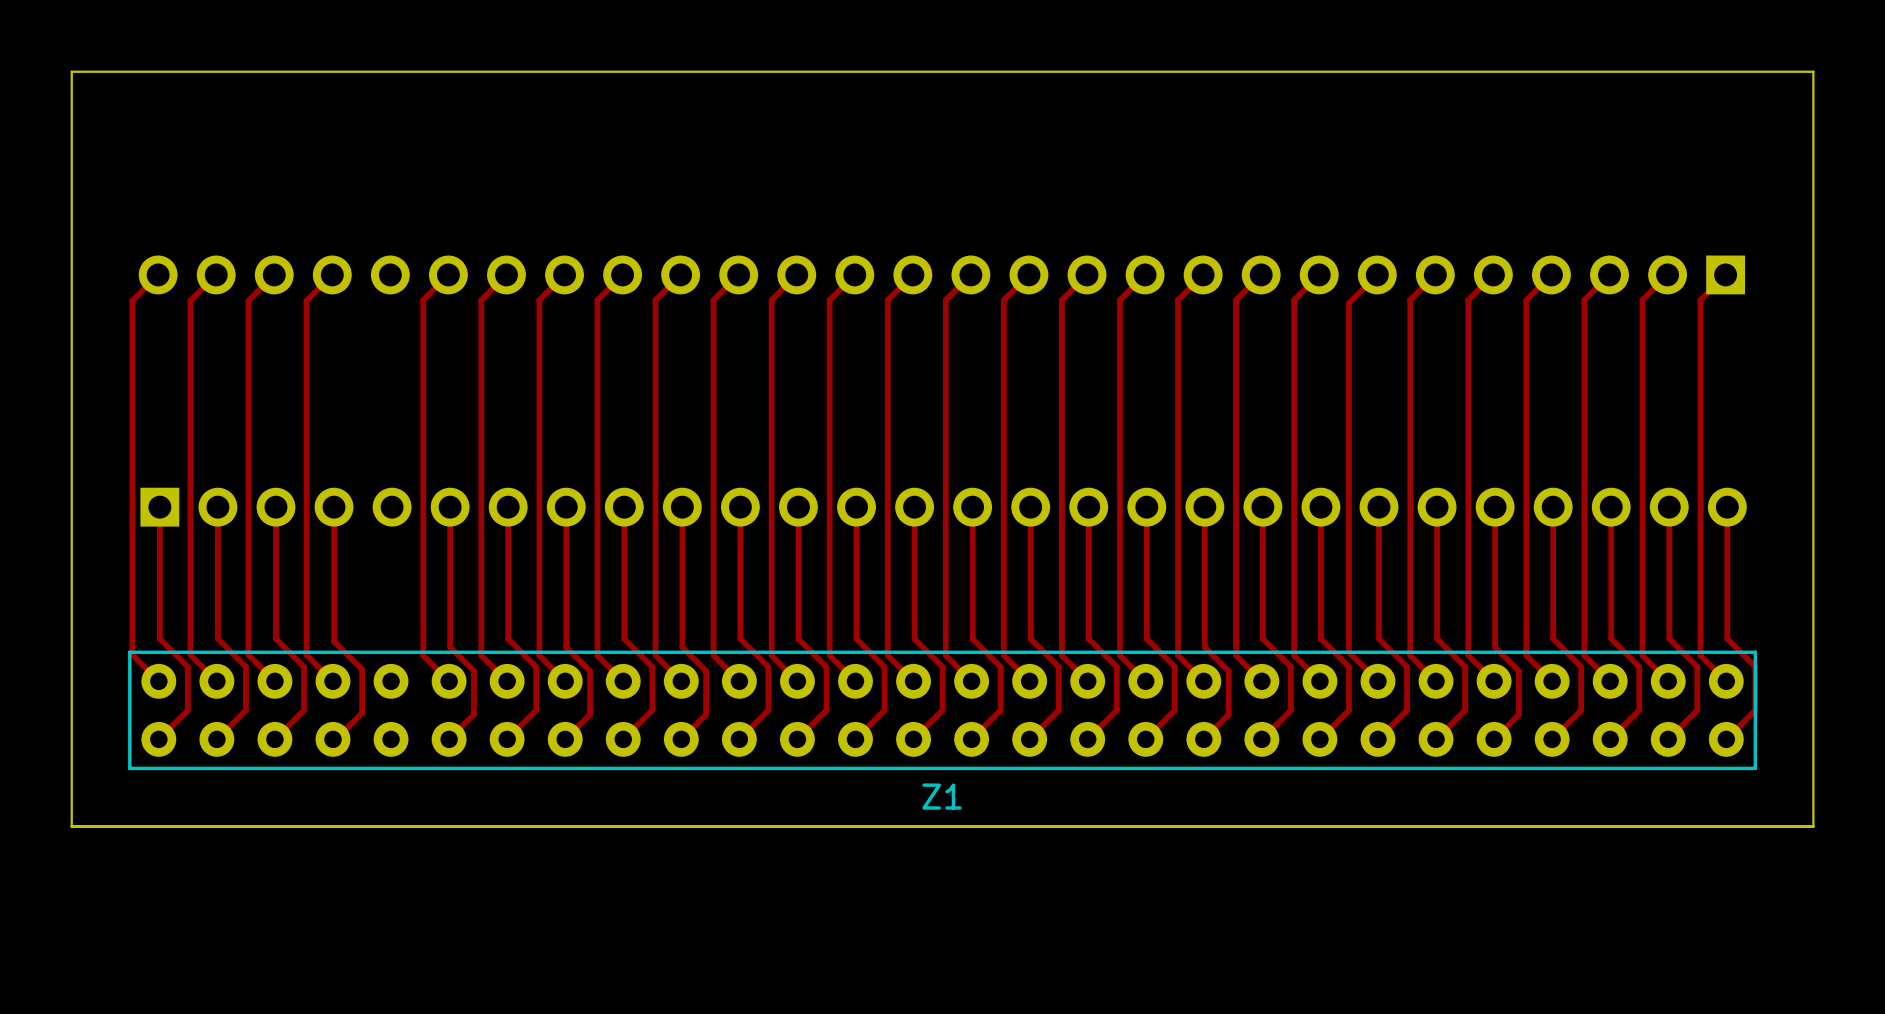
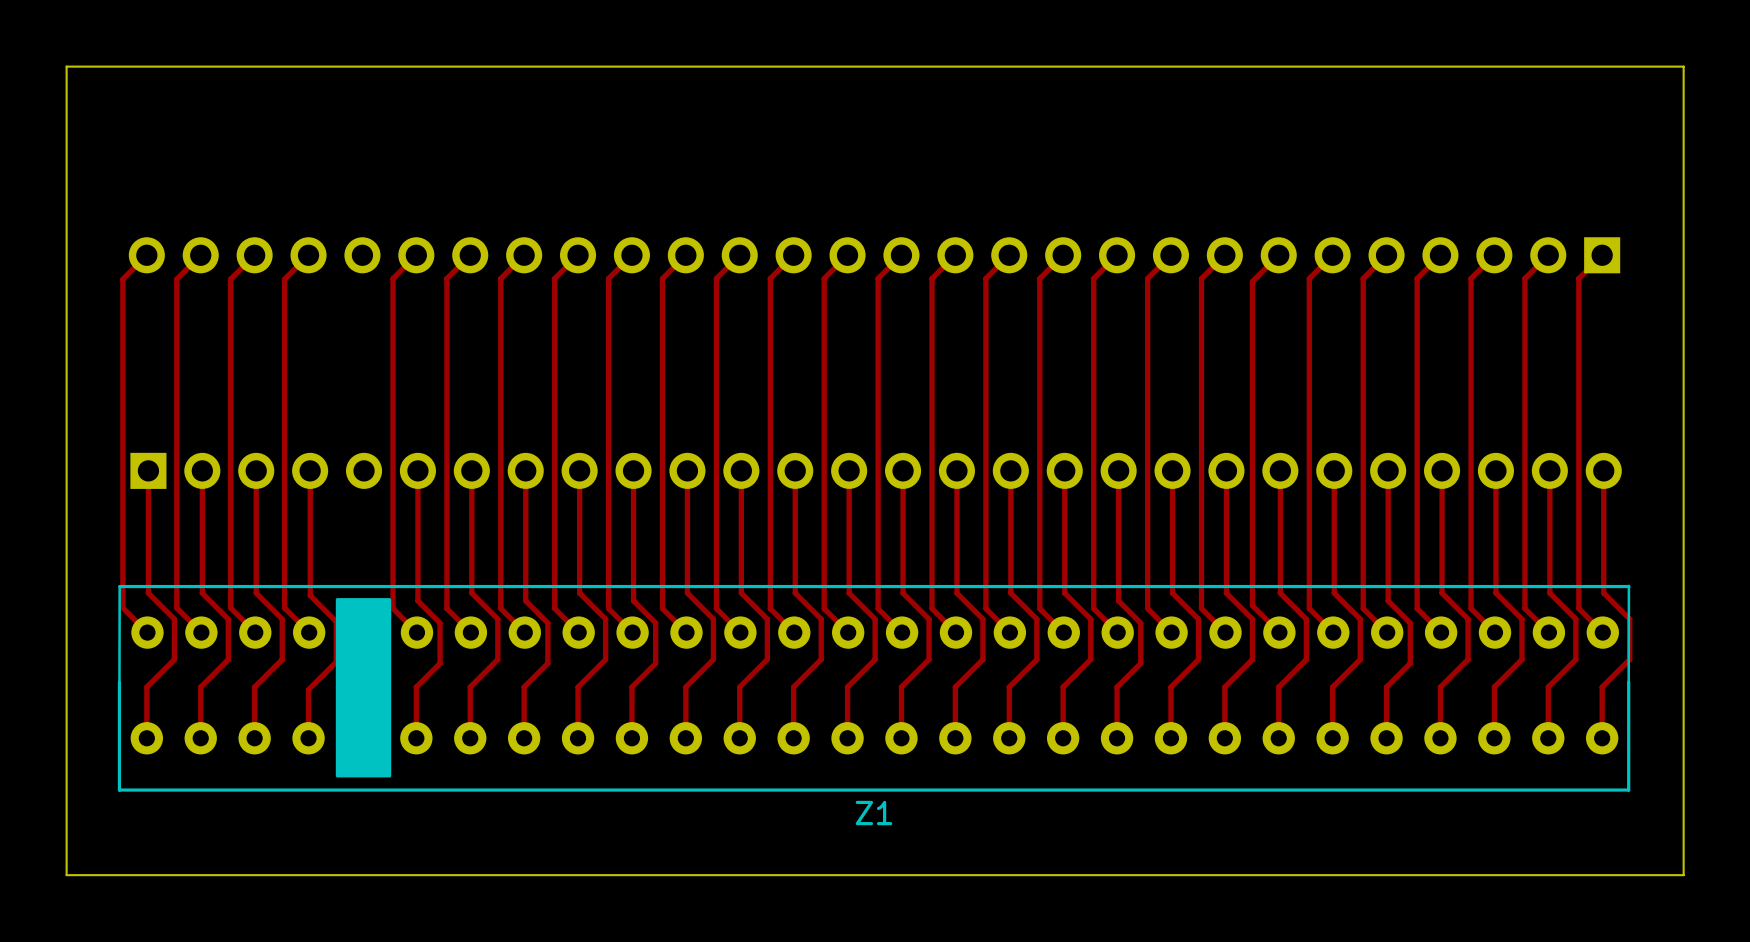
drawing: none -> [335, 598, 392, 778]
Z1 footprint: [128, 650, 1758, 771] -> [117, 584, 1631, 792]
track: none -> (147, 686) (146, 738)
track: none -> (201, 686) (200, 738)
track: none -> (255, 686) (254, 738)
track: none -> (416, 686) (416, 738)
track: none -> (470, 686) (470, 738)
track: none -> (524, 686) (524, 738)
track: none -> (578, 686) (578, 738)
track: none -> (632, 686) (631, 738)
track: none -> (686, 686) (685, 738)
track: none -> (740, 686) (739, 738)
track: none -> (794, 686) (793, 738)
track: none -> (848, 686) (847, 738)
track: none -> (902, 686) (901, 738)
track: none -> (955, 686) (955, 738)
track: none -> (1009, 686) (1009, 738)
track: none -> (1063, 686) (1063, 738)
track: none -> (1117, 686) (1117, 738)
track: none -> (1171, 686) (1170, 738)
track: none -> (1225, 686) (1224, 738)
track: none -> (1279, 686) (1278, 738)
track: none -> (1333, 686) (1332, 738)
track: none -> (1387, 686) (1386, 738)
track: none -> (1441, 686) (1440, 738)
track: none -> (1495, 686) (1494, 738)
track: none -> (1548, 686) (1548, 738)
track: none -> (1602, 686) (1602, 738)
track: none -> (309, 688) (308, 738)
Z1 name position: Z1 (942, 796) -> Z1 (873, 813)
board edge: (71, 826) (1813, 826) -> (66, 767) (66, 875) (1683, 875) (1683, 767)

